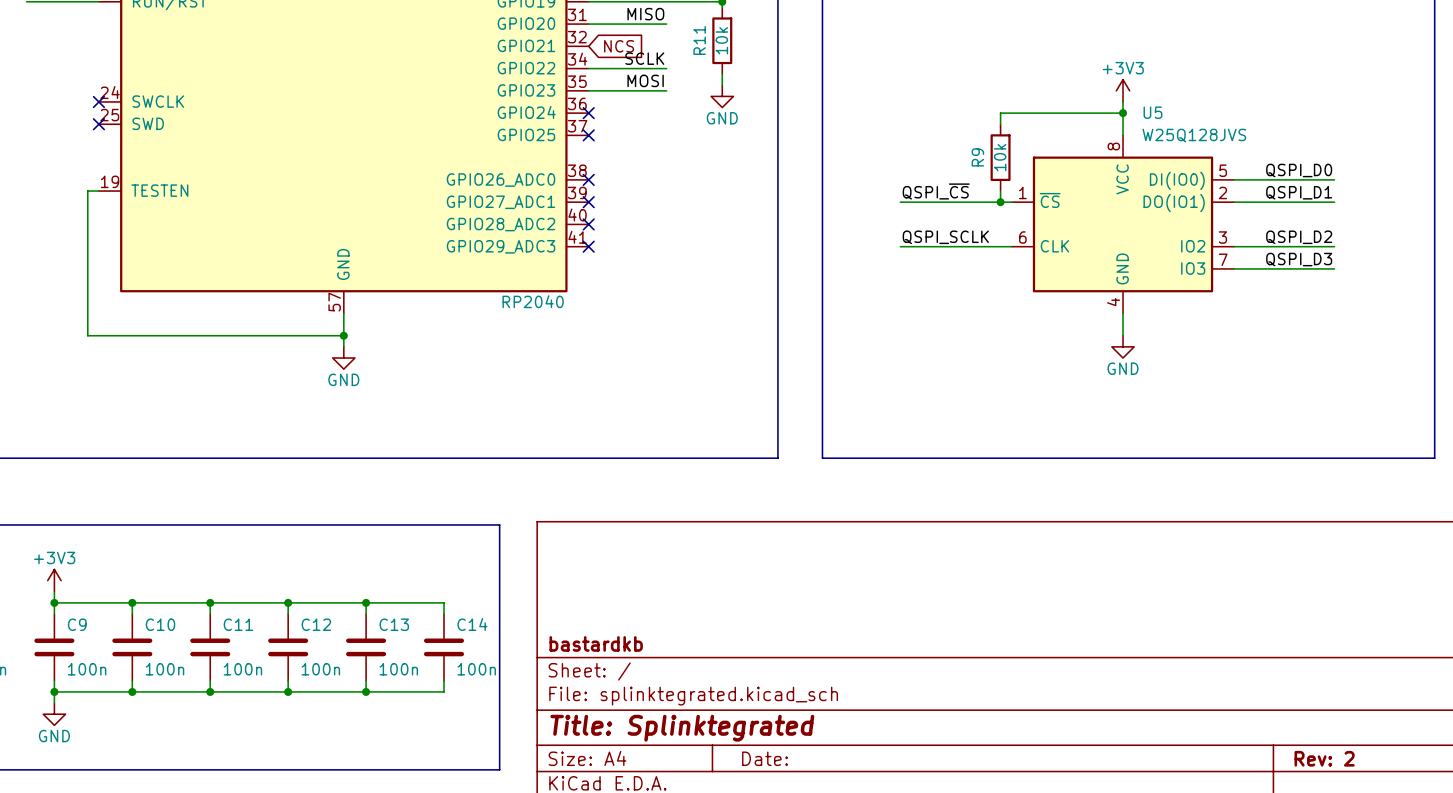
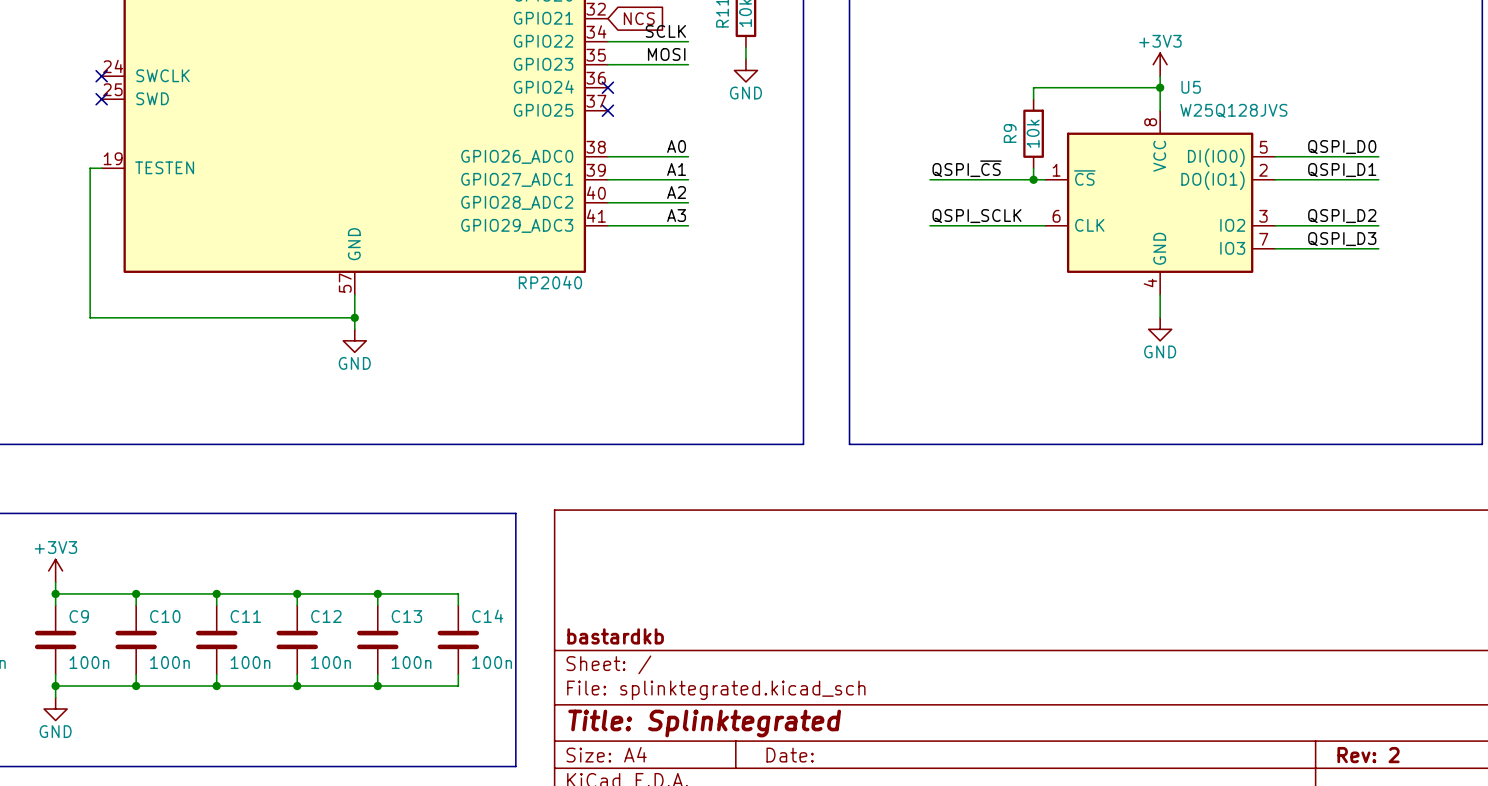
label: none -> A0 (676, 146)
wire: none -> (607, 156) (688, 156)
no-connect mark: (588, 179) -> none
label: none -> A1 (676, 169)
wire: none -> (607, 179) (688, 179)
no-connect mark: (588, 202) -> none
label: none -> A2 (676, 192)
wire: none -> (607, 202) (688, 202)
no-connect mark: (588, 224) -> none
label: none -> A3 (676, 215)
wire: none -> (607, 225) (688, 225)
no-connect mark: (588, 246) -> none

